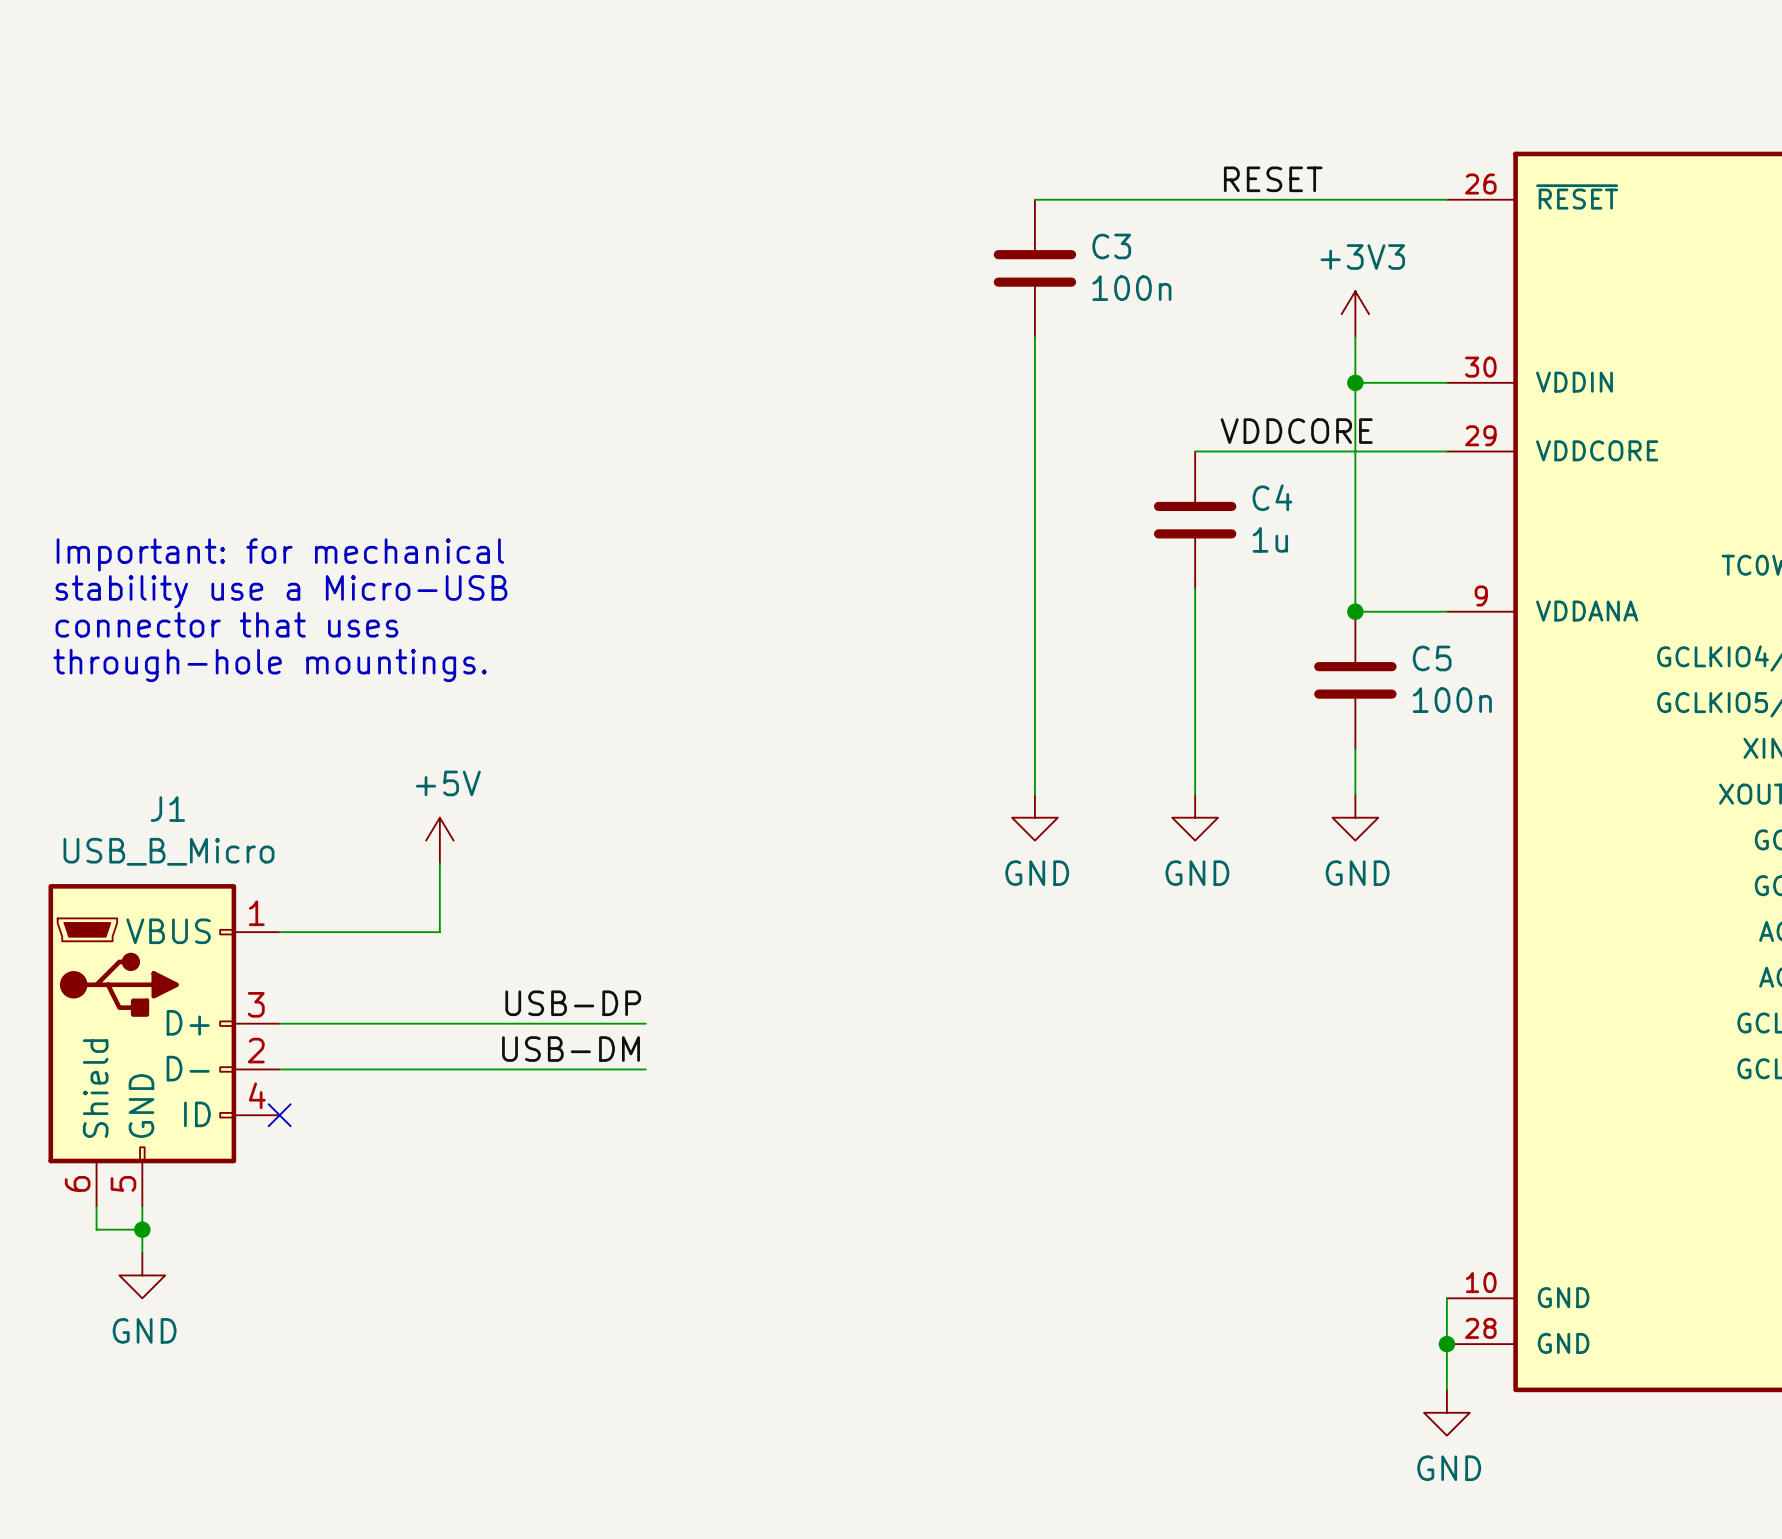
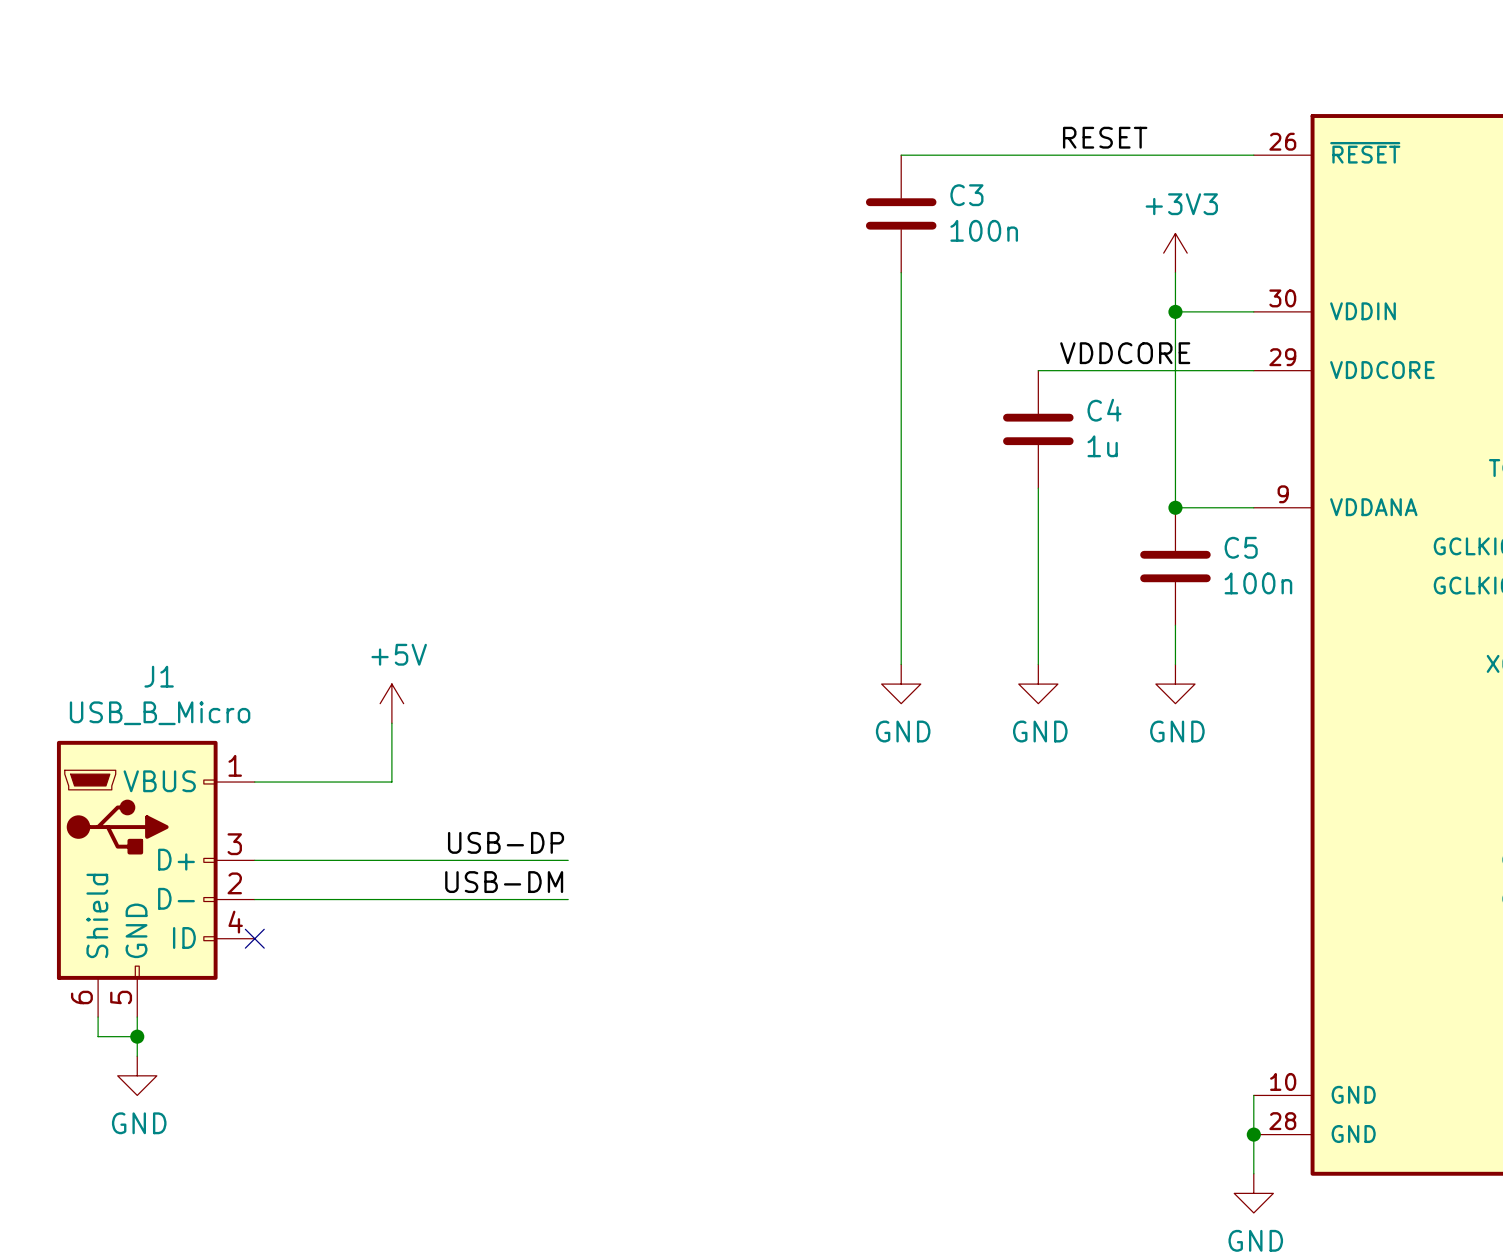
text: Important: for mechanical (280, 554) -> none
text: stability use a Micro-USB (281, 591) -> none
text: connector that uses (226, 624) -> none
text: through-hole mountings. (270, 665) -> none

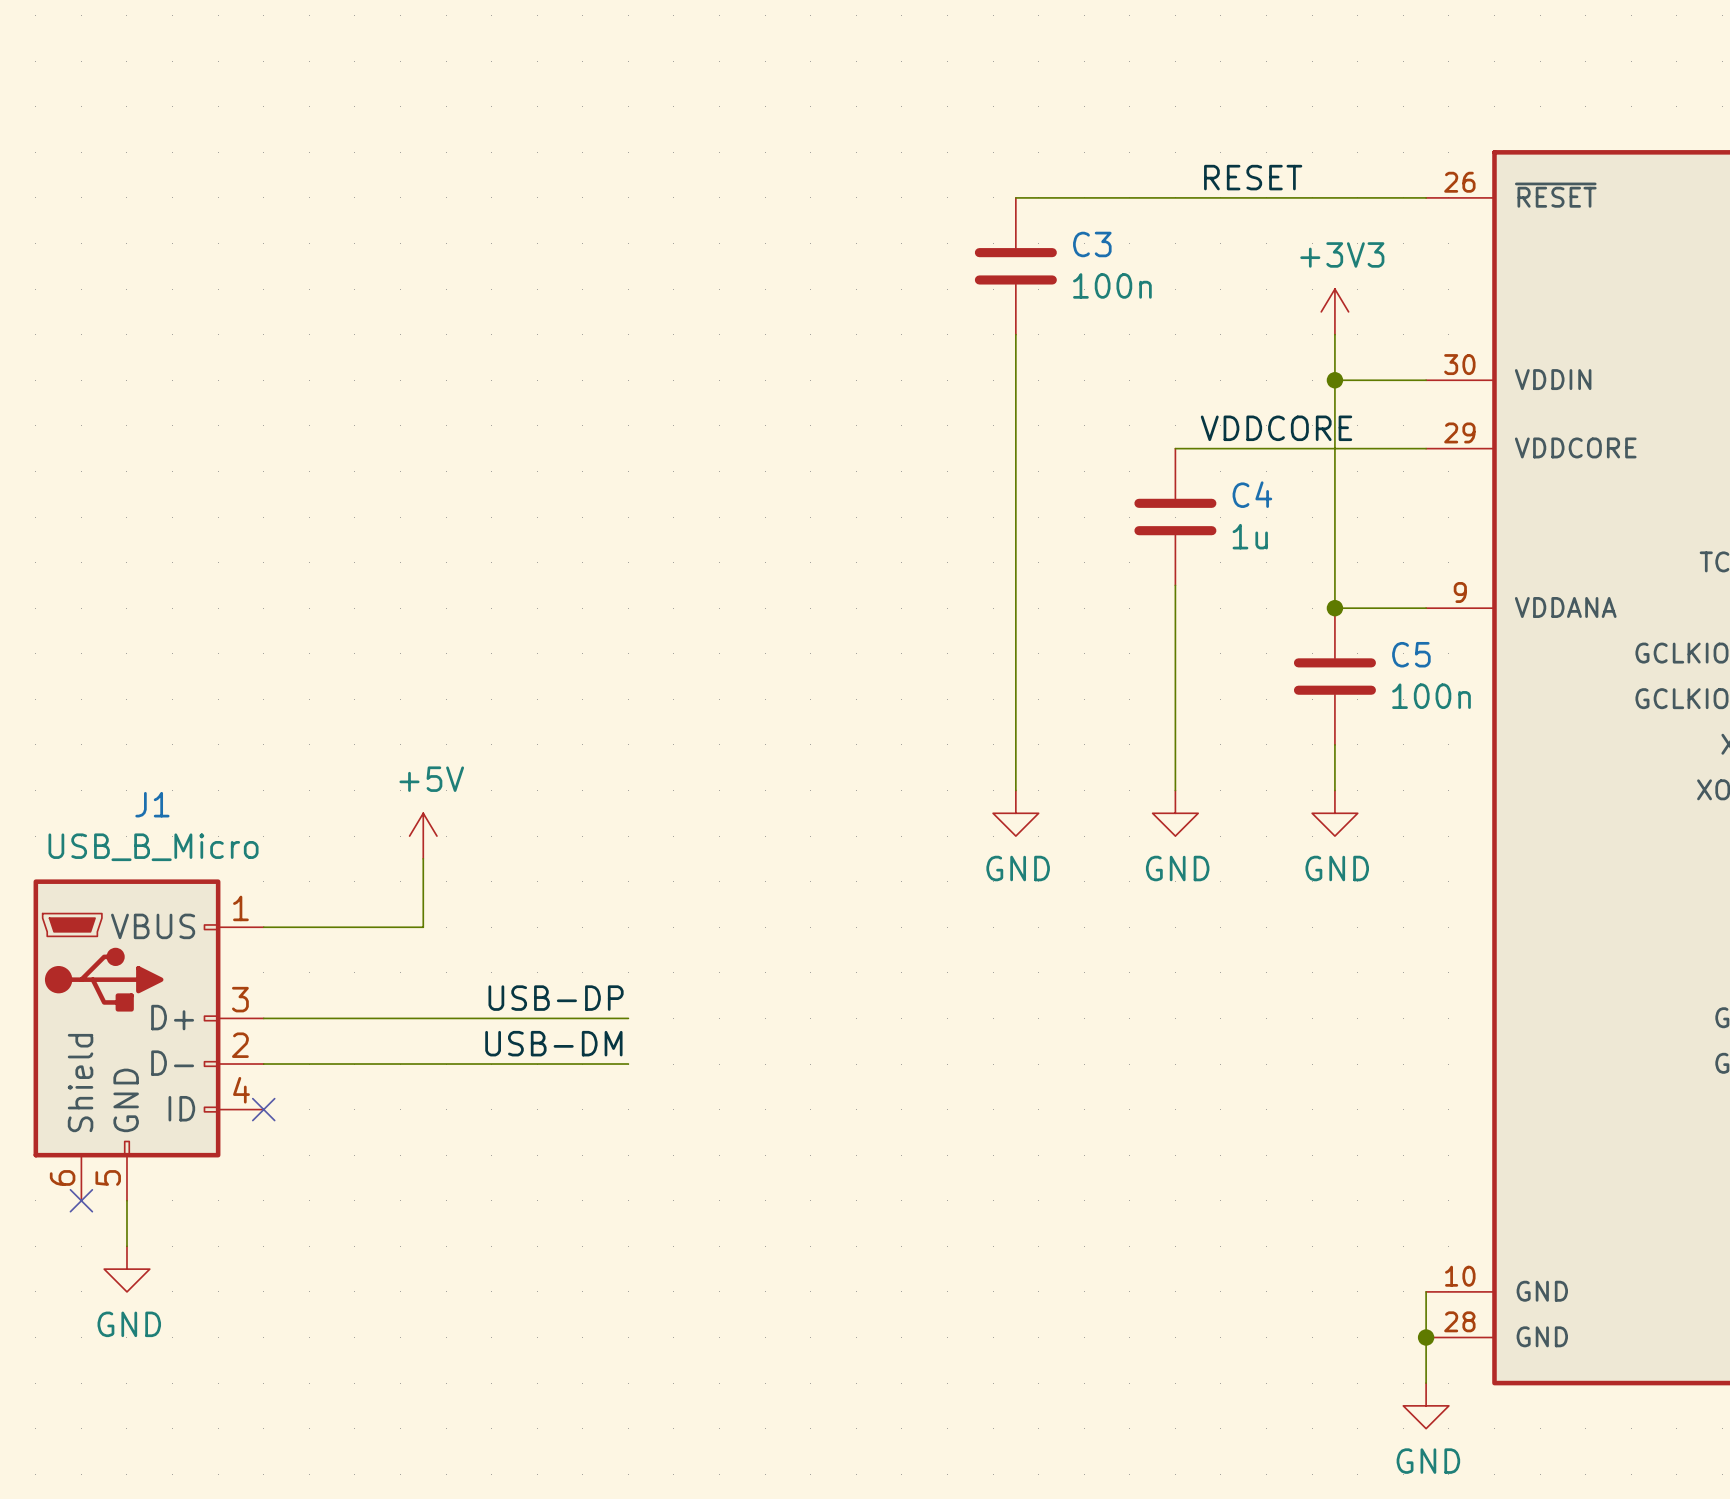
wire: (98, 1017) (98, 1036) (137, 1036) -> none
no-connect mark: none -> (81, 1200)
junction: (137, 1036) -> none

